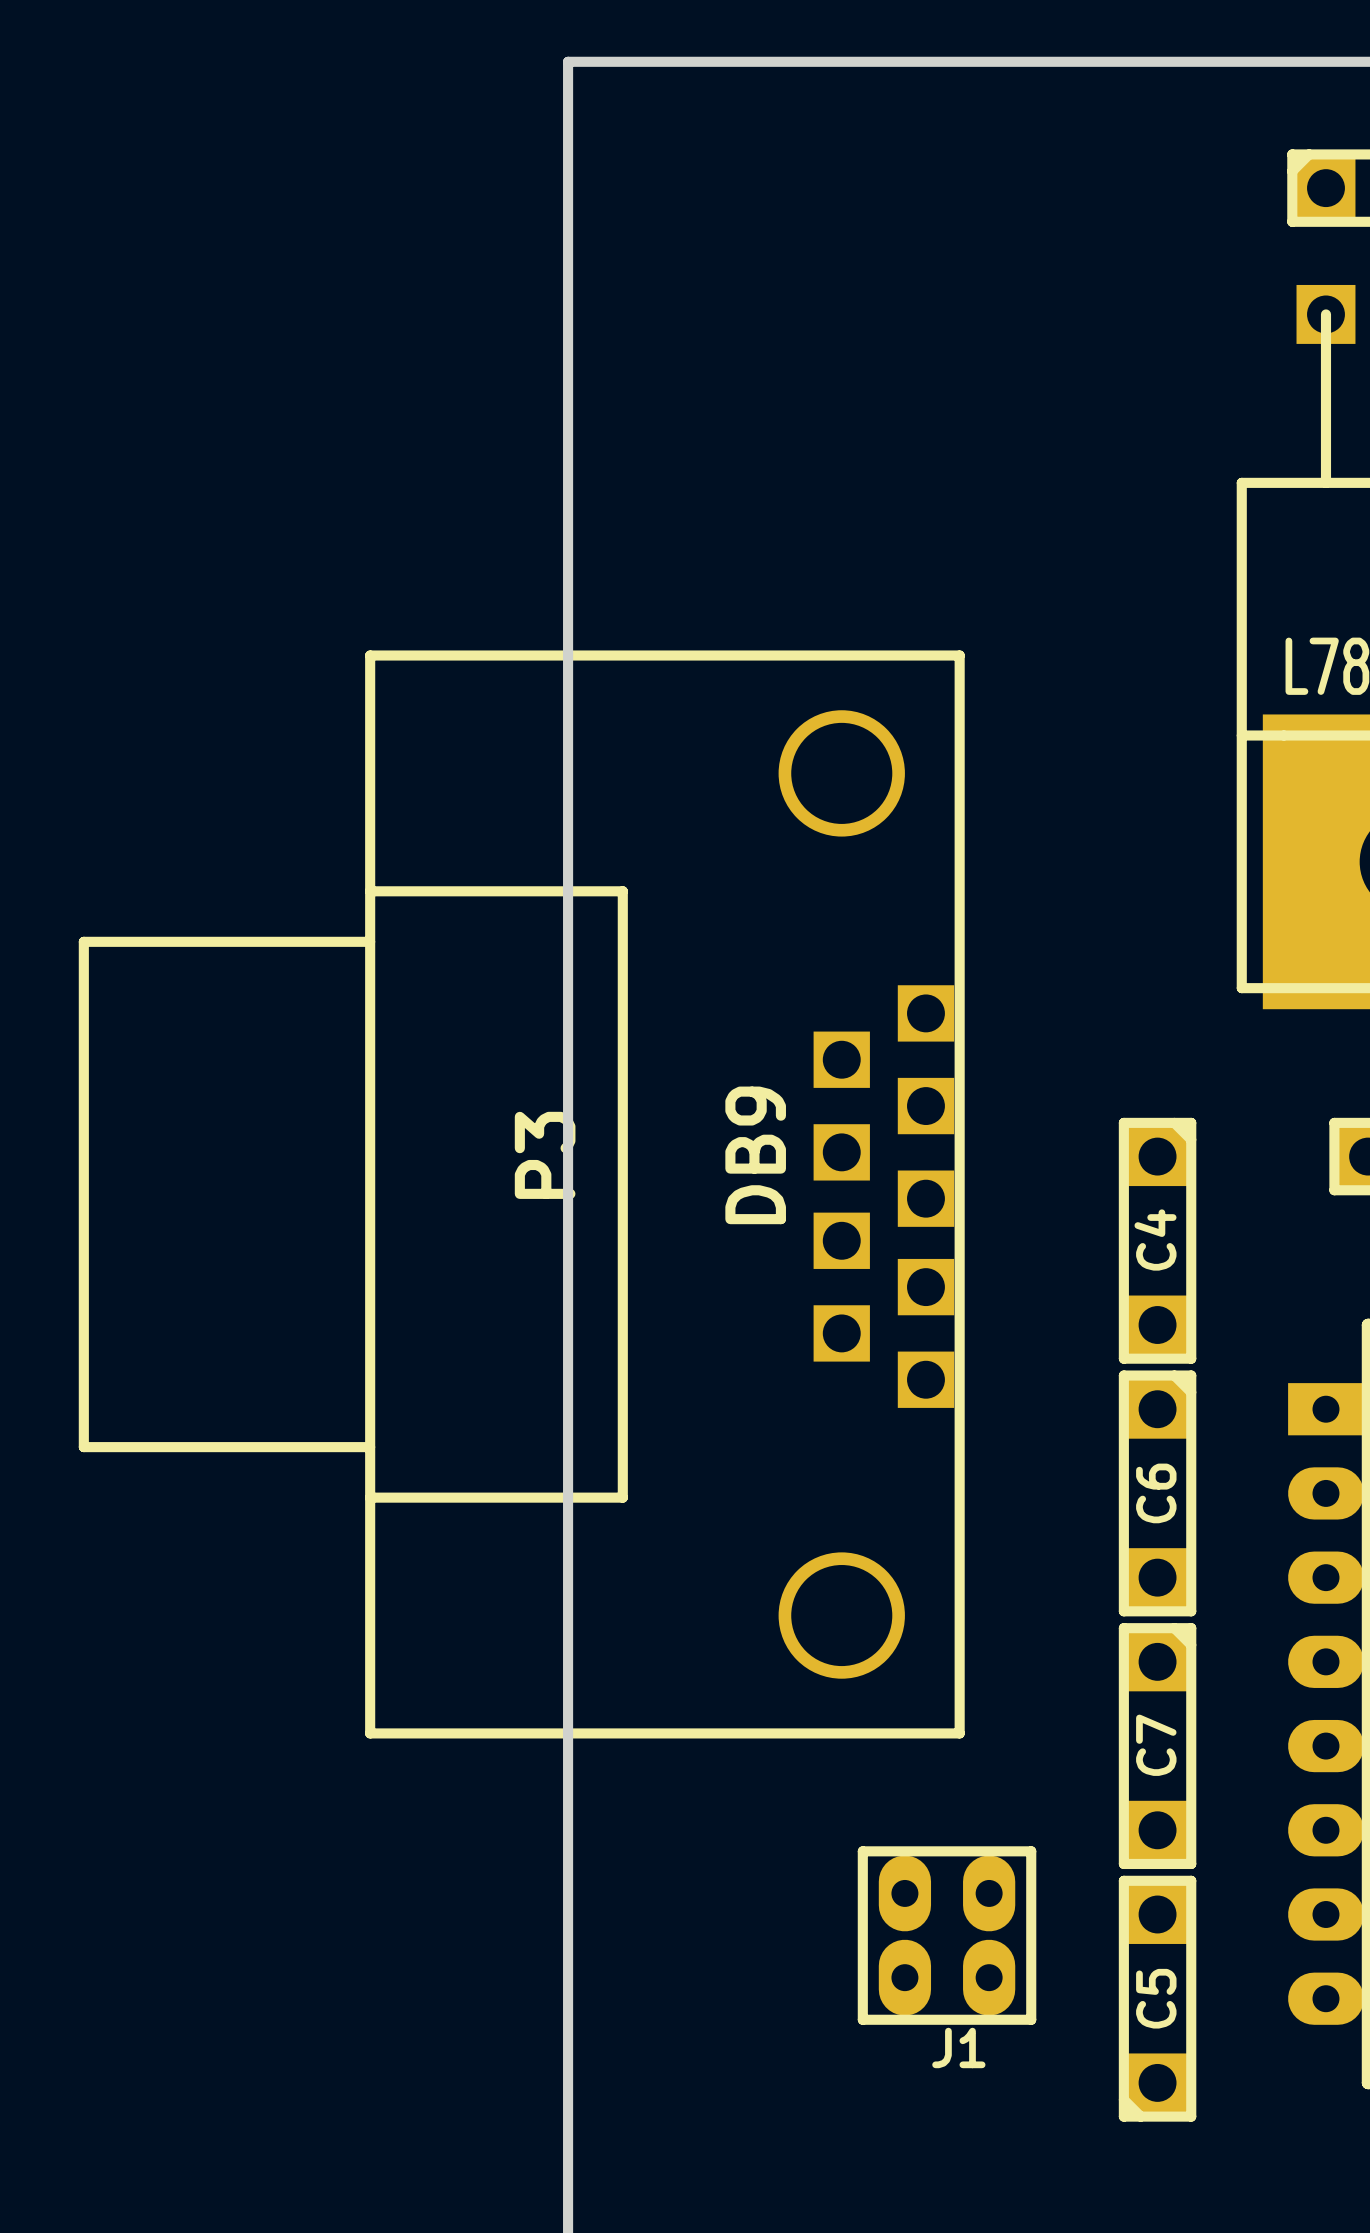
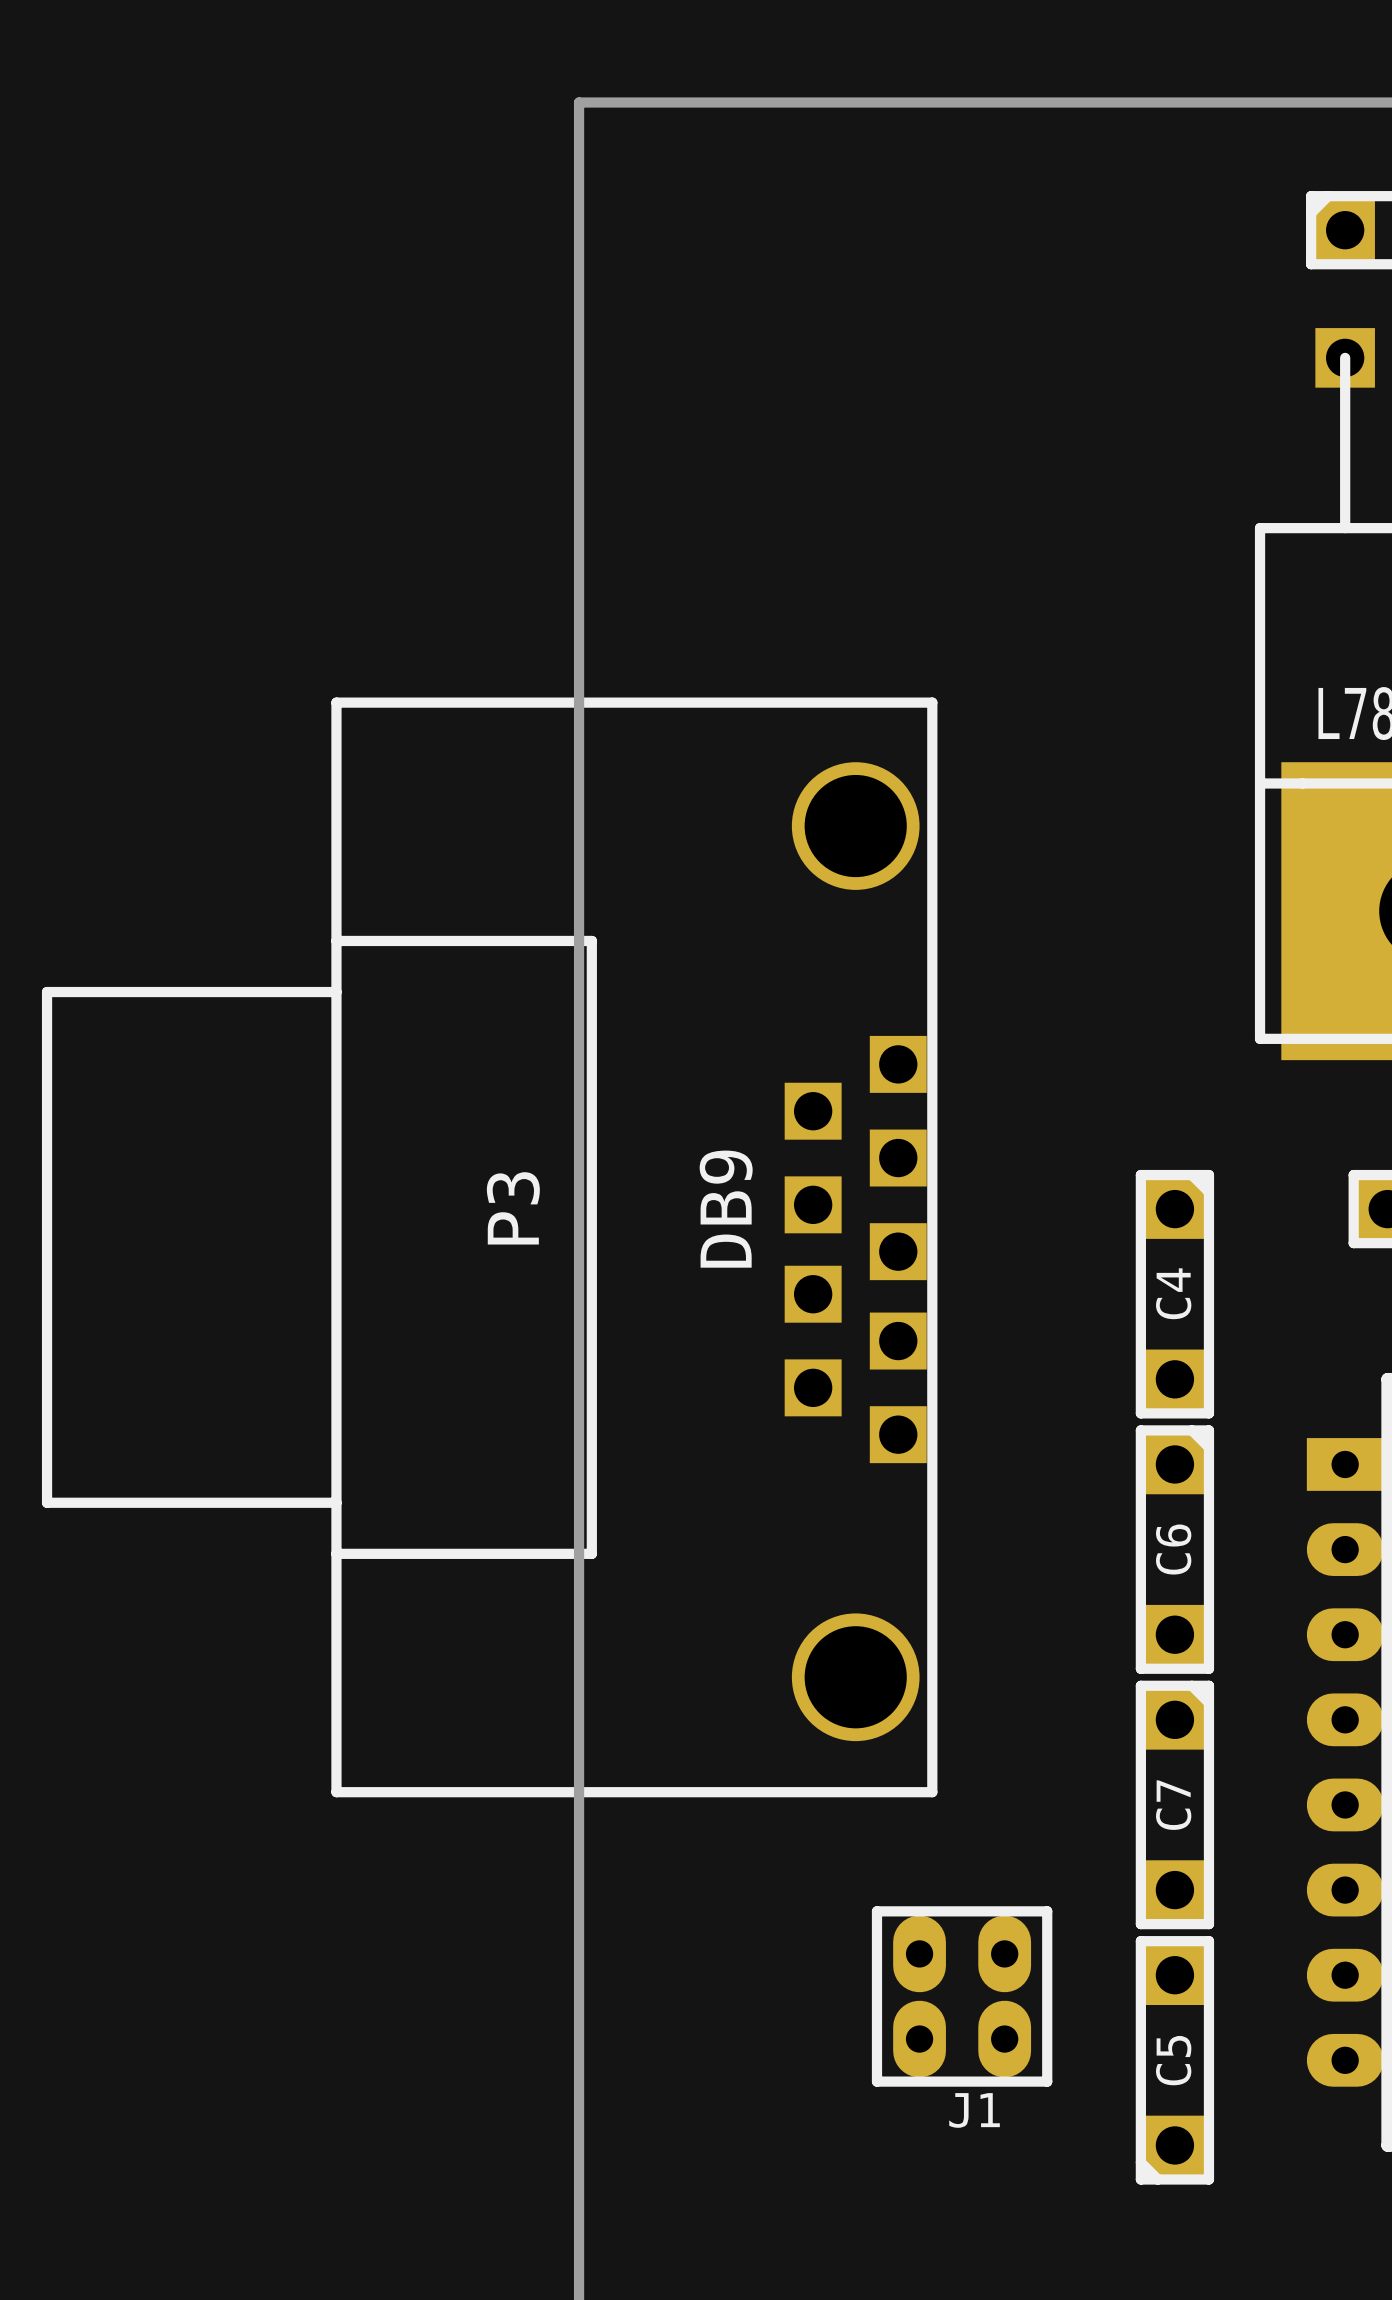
P3 footprint: [78, 650, 965, 1739] -> [41, 697, 938, 1798]

